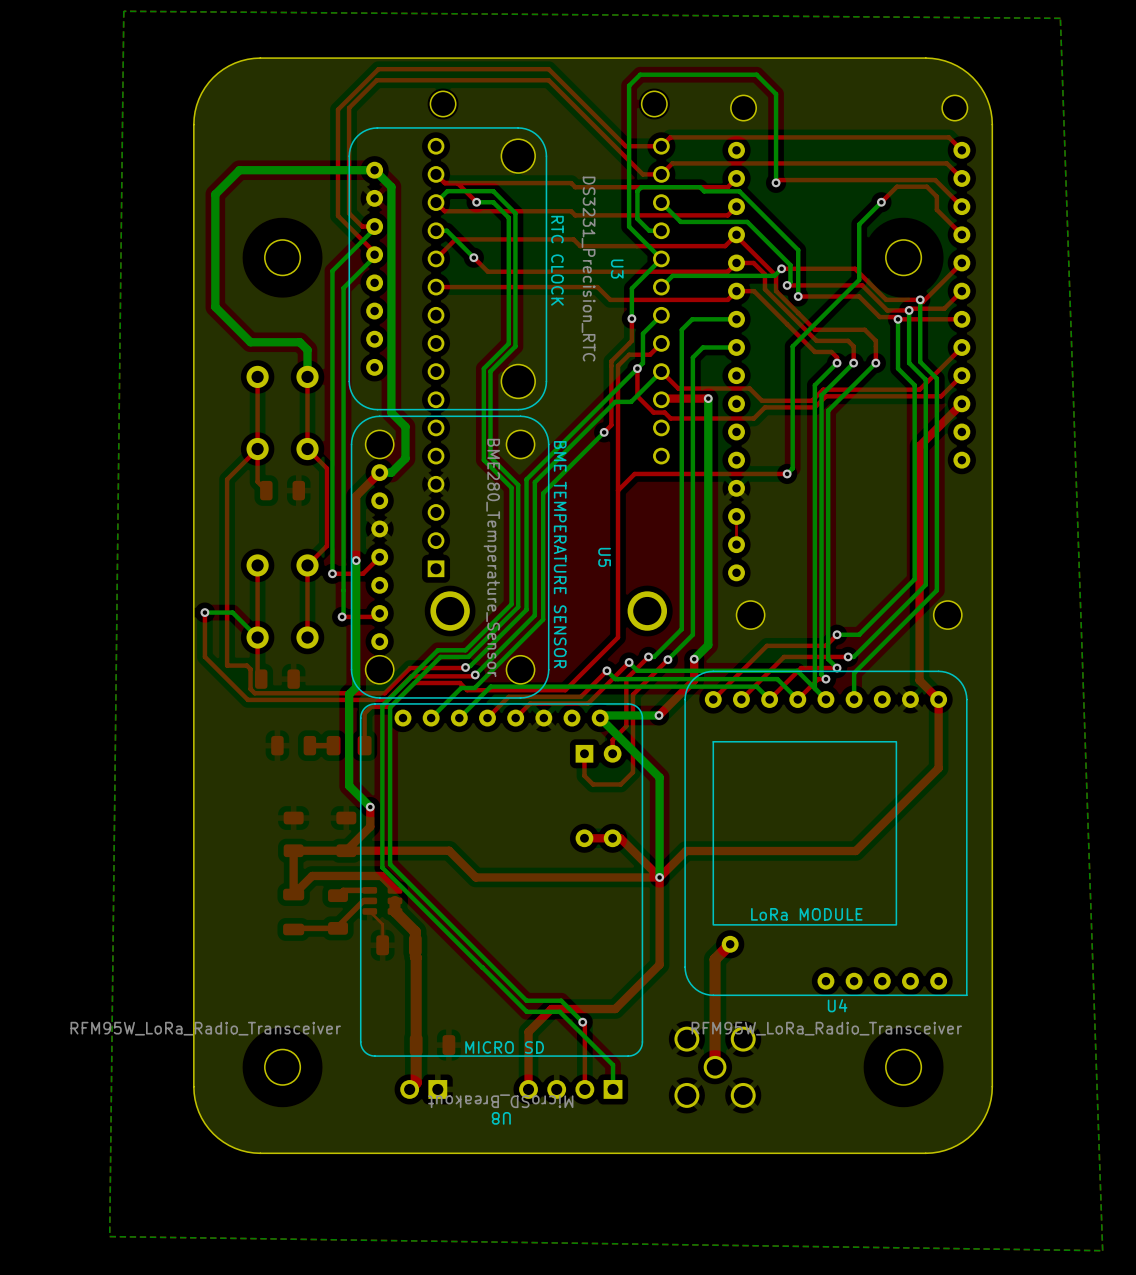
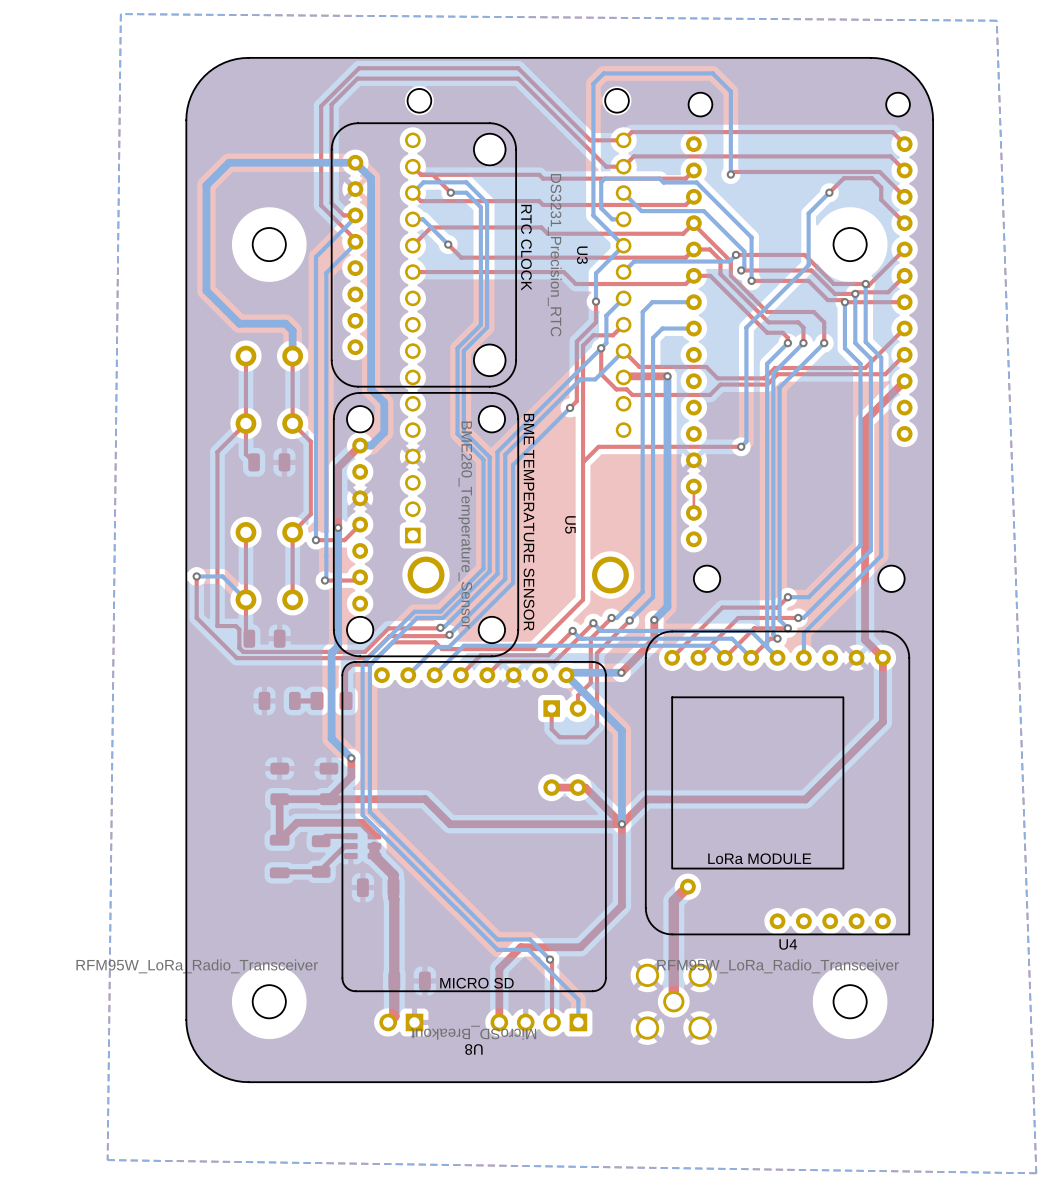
top track: (369, 911) (382, 924) (382, 945) -> none

